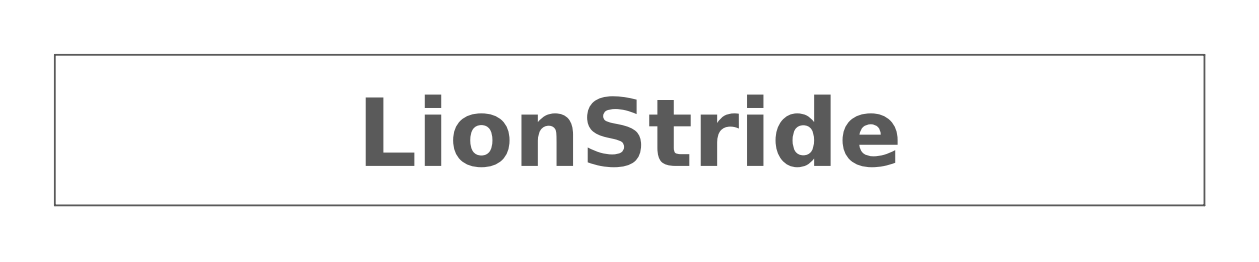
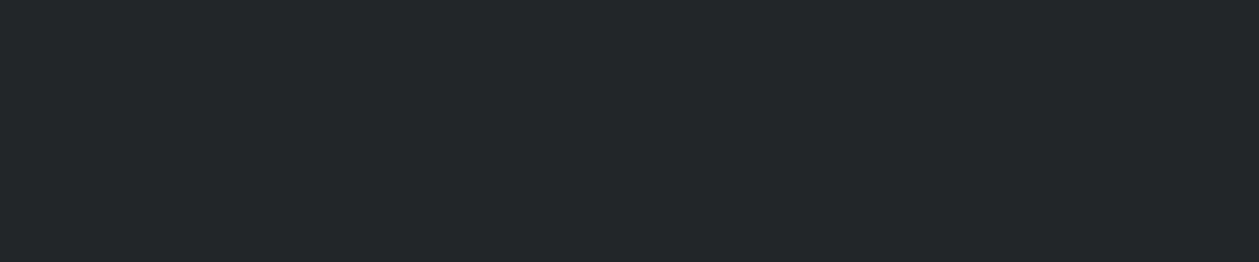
line: (54, 54) (1204, 54) (1204, 205) (54, 205) (54, 54) -> none
text: LionStride (631, 130) -> none

